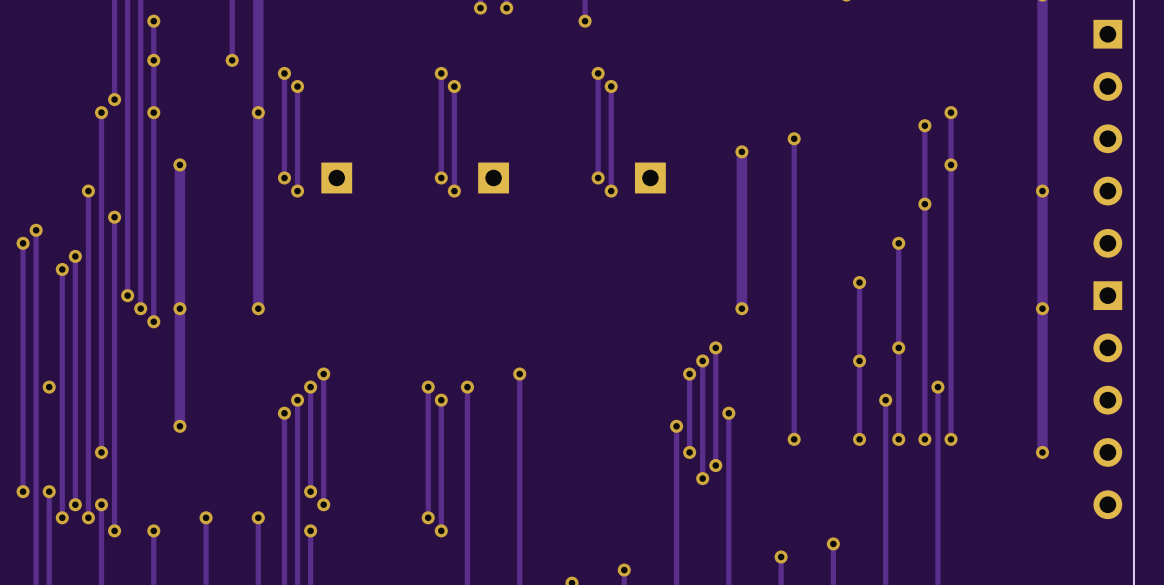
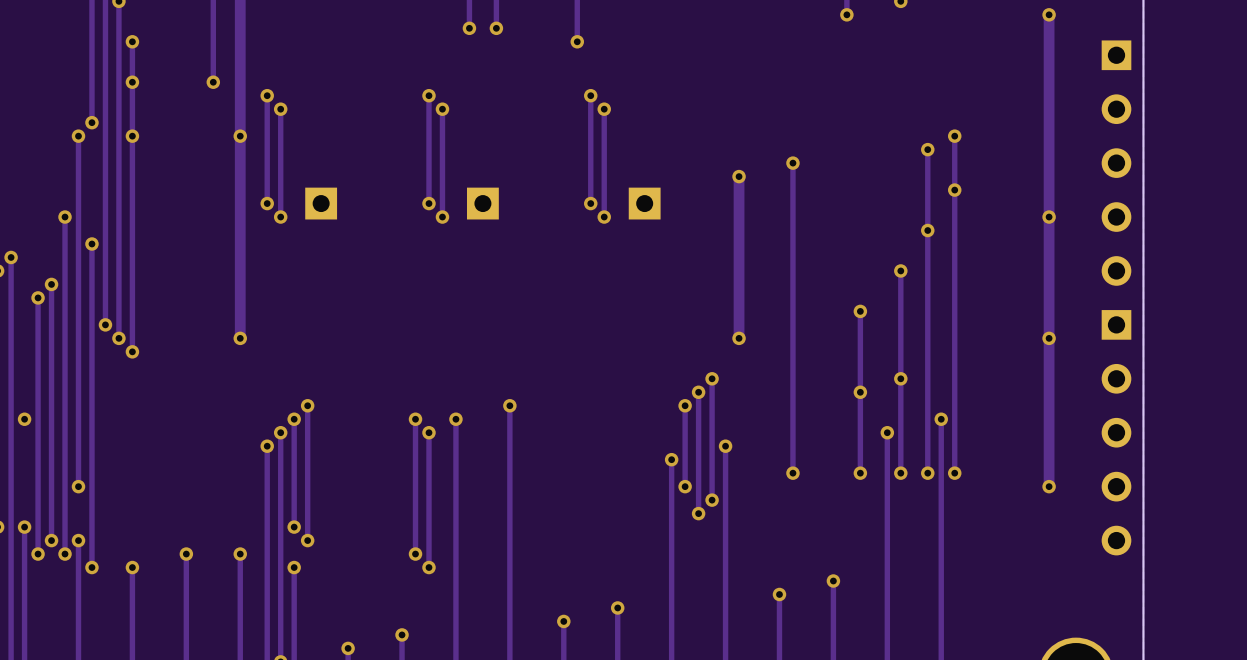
track: (179, 164) (179, 426) -> none
via: (179, 164) -> none
via: (179, 308) -> none
via: (179, 426) -> none

